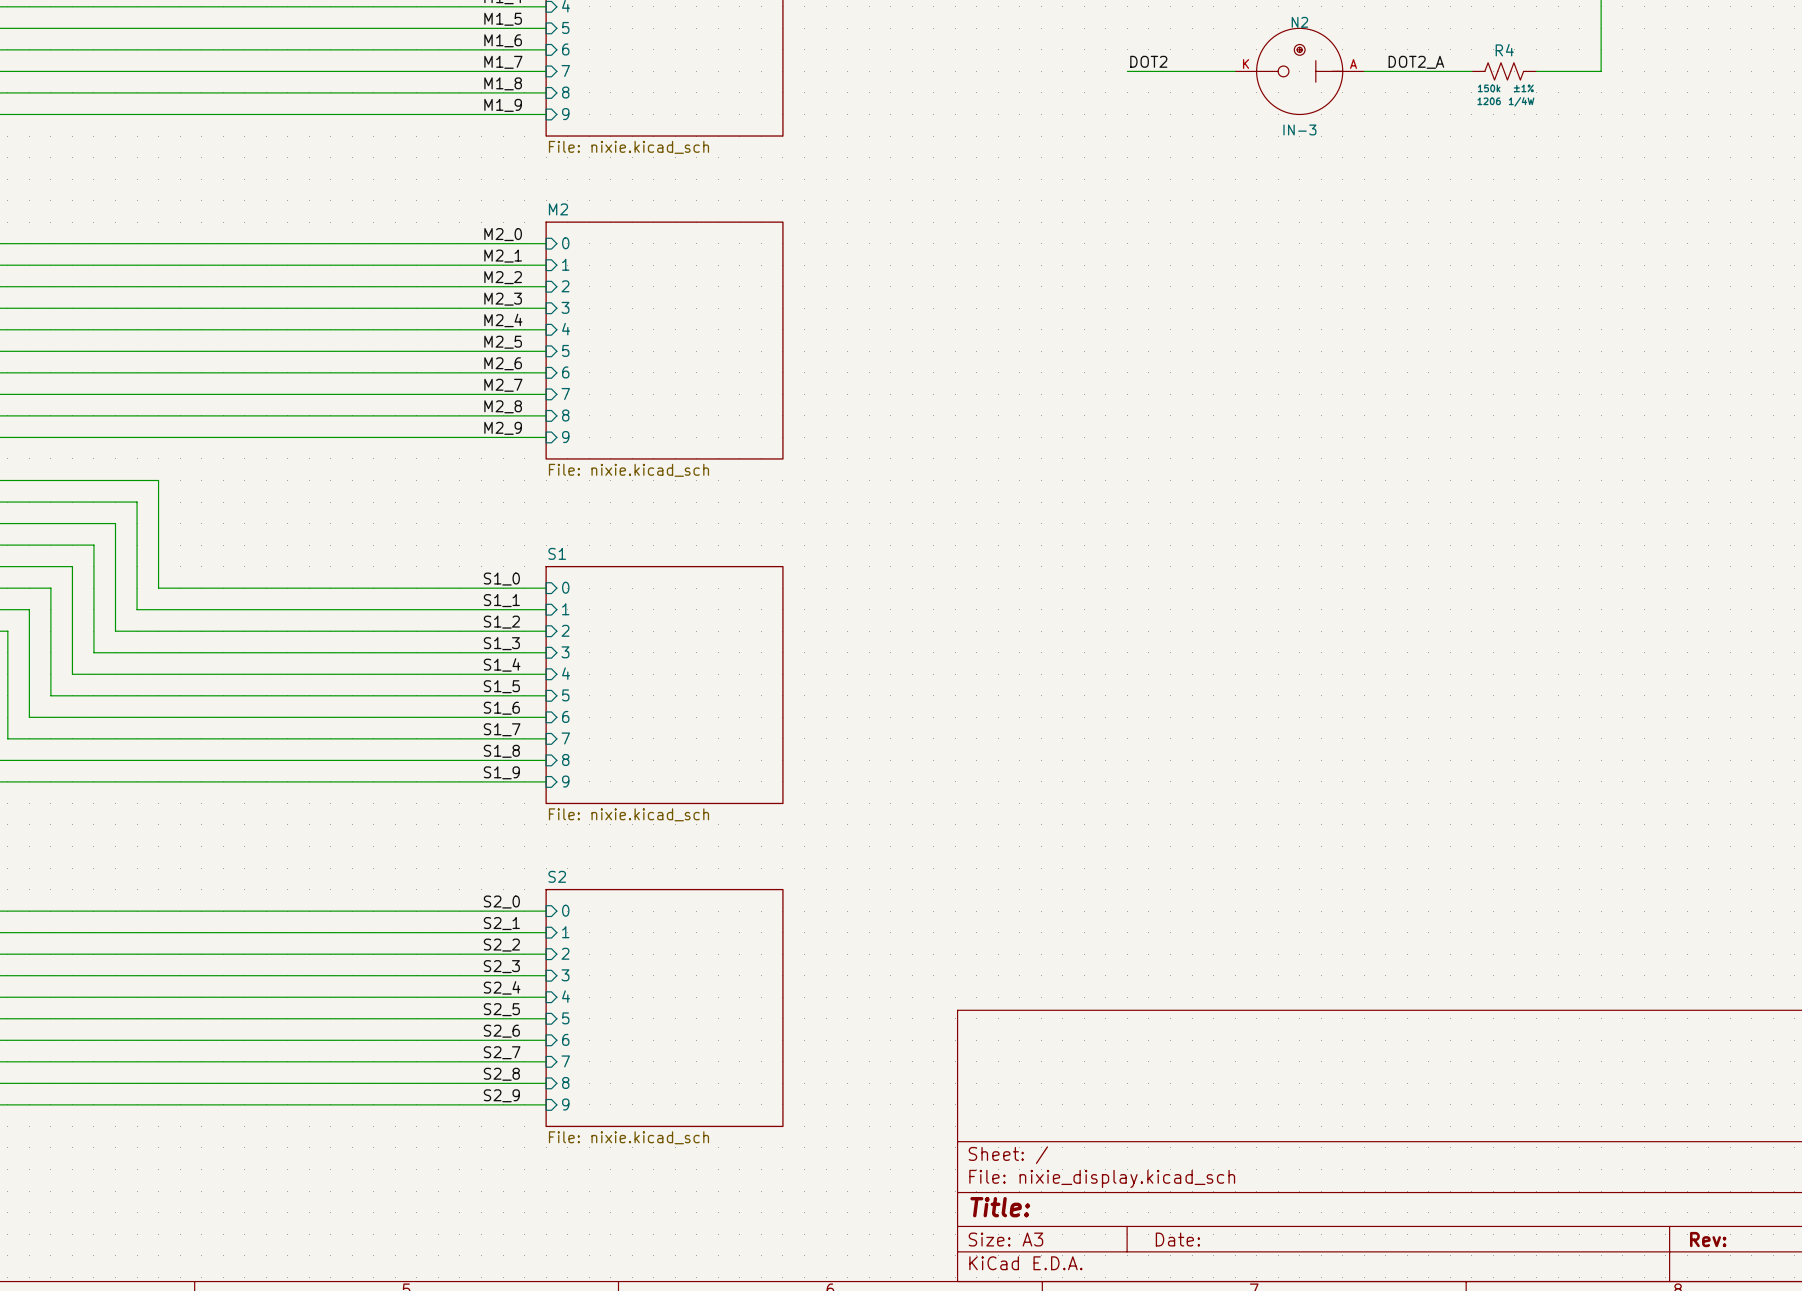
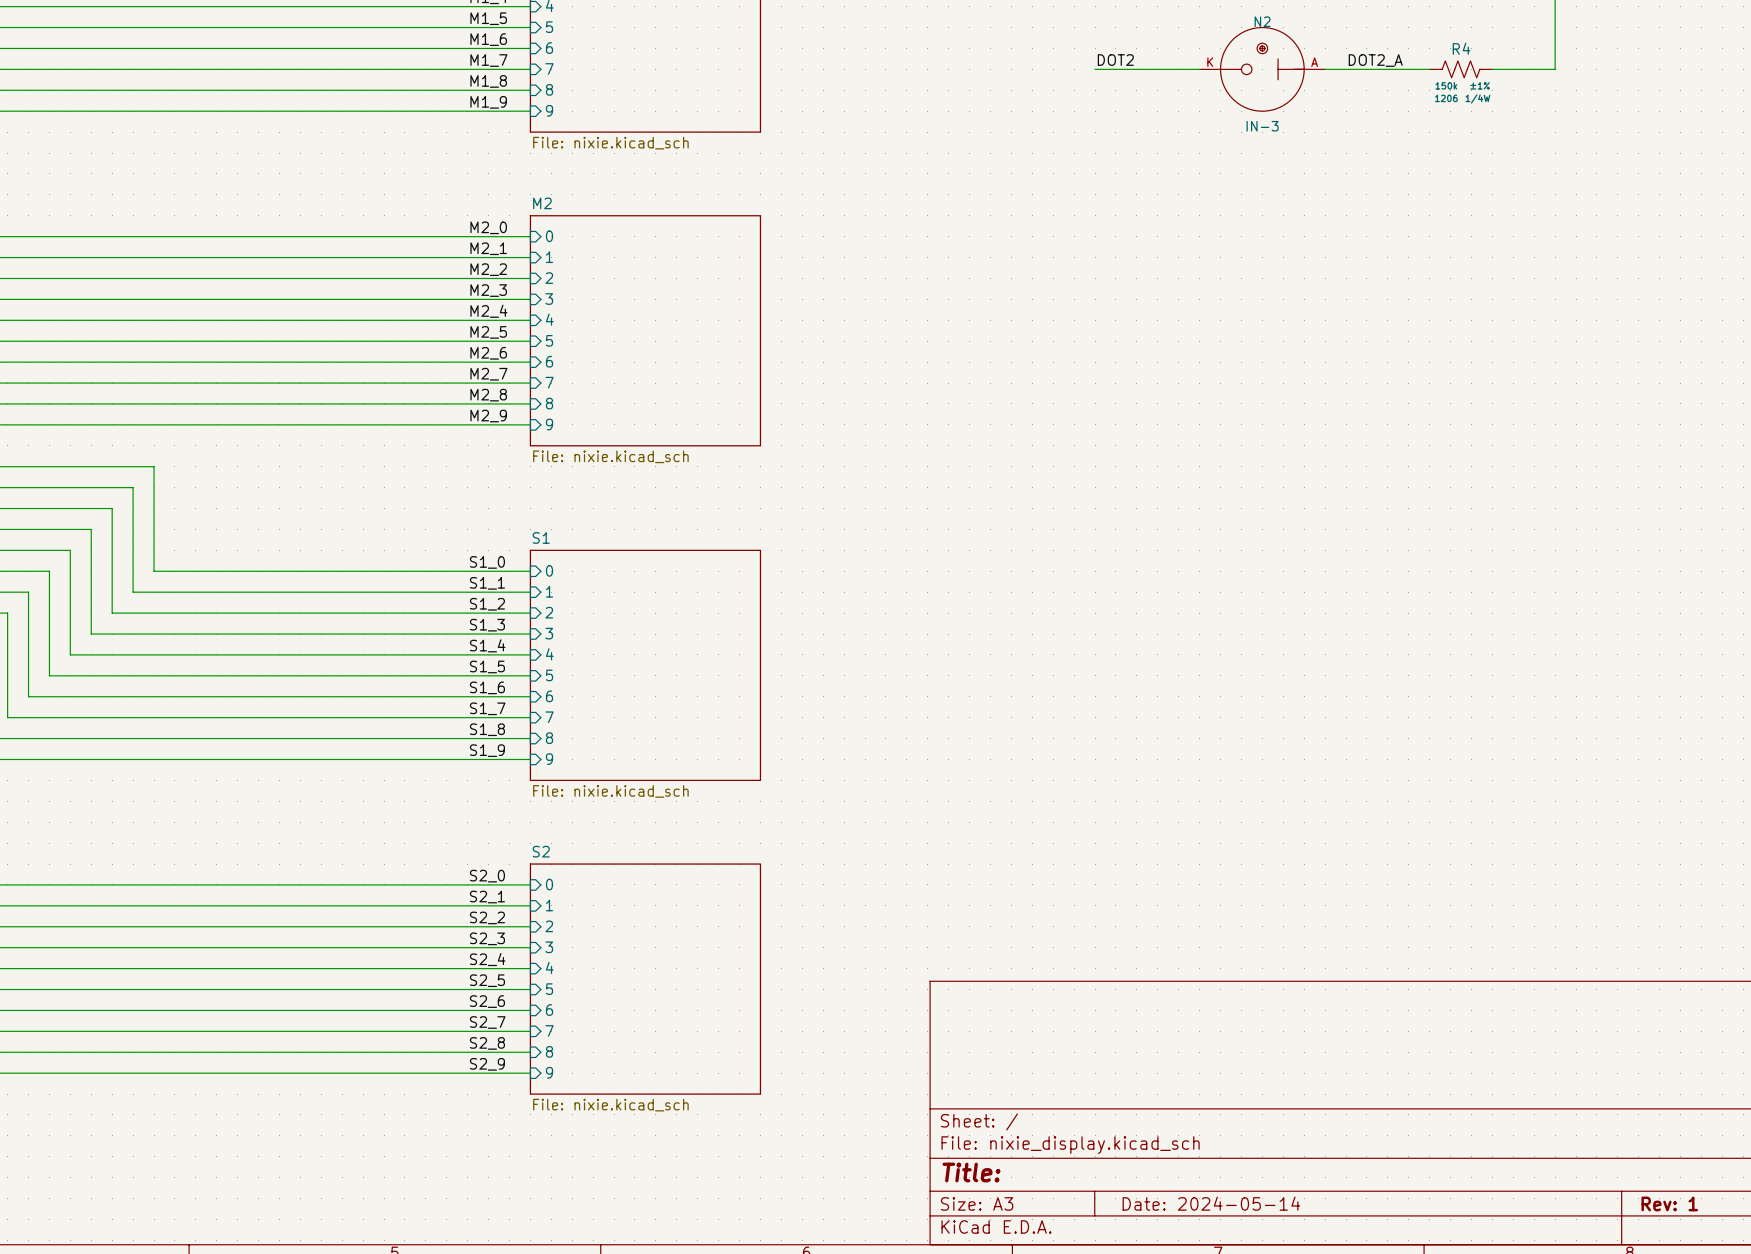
title block: Date: (1177, 1239) -> Date: 2024-05-14 (1211, 1203)
title block: Rev: (1708, 1239) -> Rev: 1 (1669, 1203)

